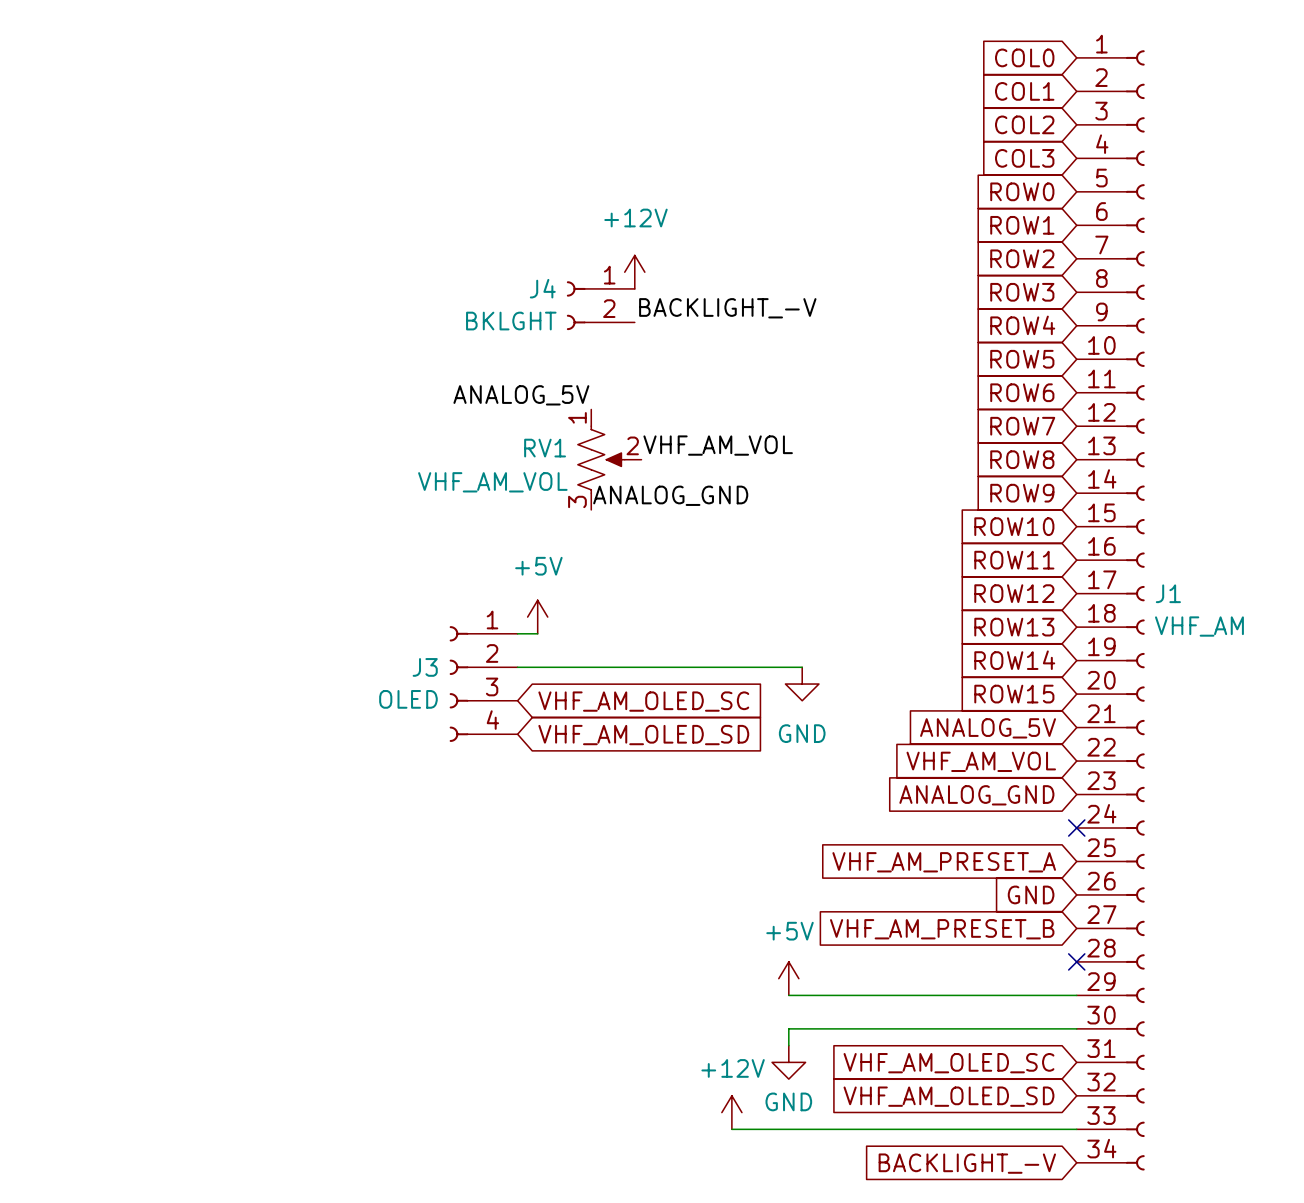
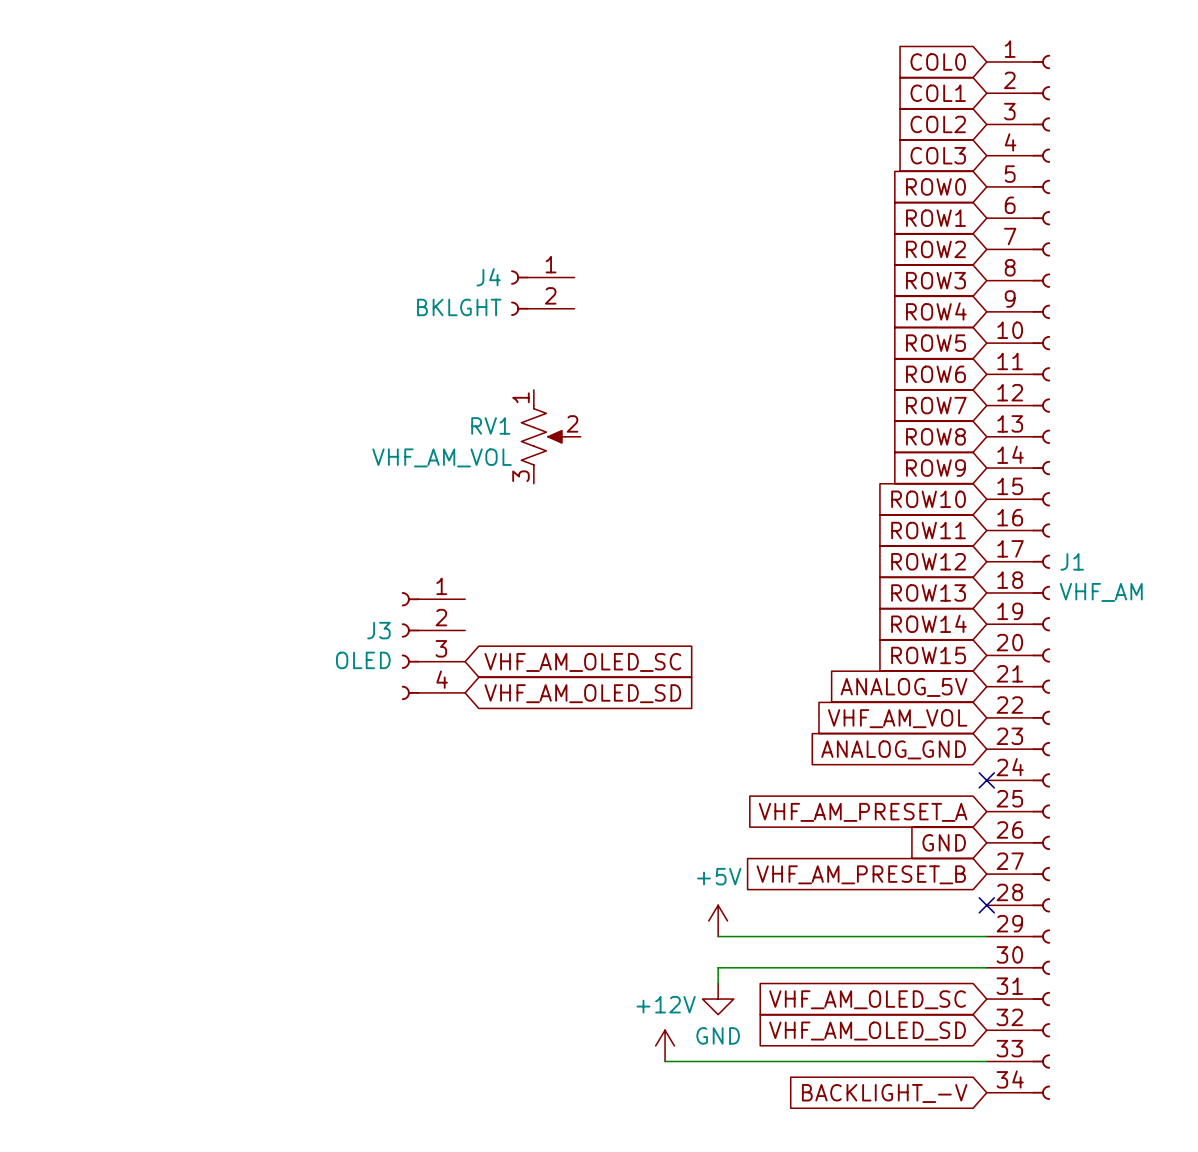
power symbol: +12V (634, 272) -> none
label: BACKLIGHT_-V (727, 308) -> none
label: ANALOG_5V (521, 395) -> none
label: VHF_AM_VOL (718, 445) -> none
label: ANALOG_GND (670, 495) -> none
power symbol: +5V (537, 617) -> none
wire: (517, 633) (537, 633) -> none
wire: (517, 667) (802, 667) -> none
power symbol: GND (802, 684) -> none

